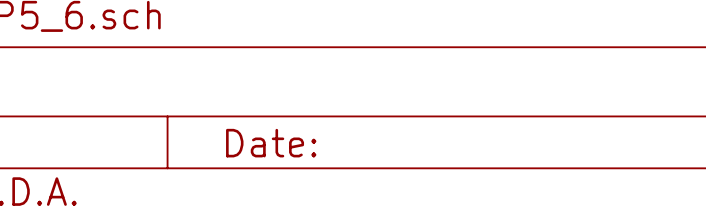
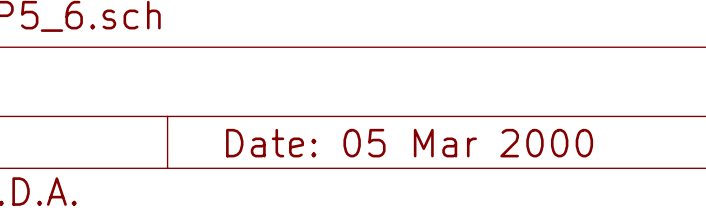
title block: Date: (271, 143) -> Date: 05 Mar 2000 (409, 143)

